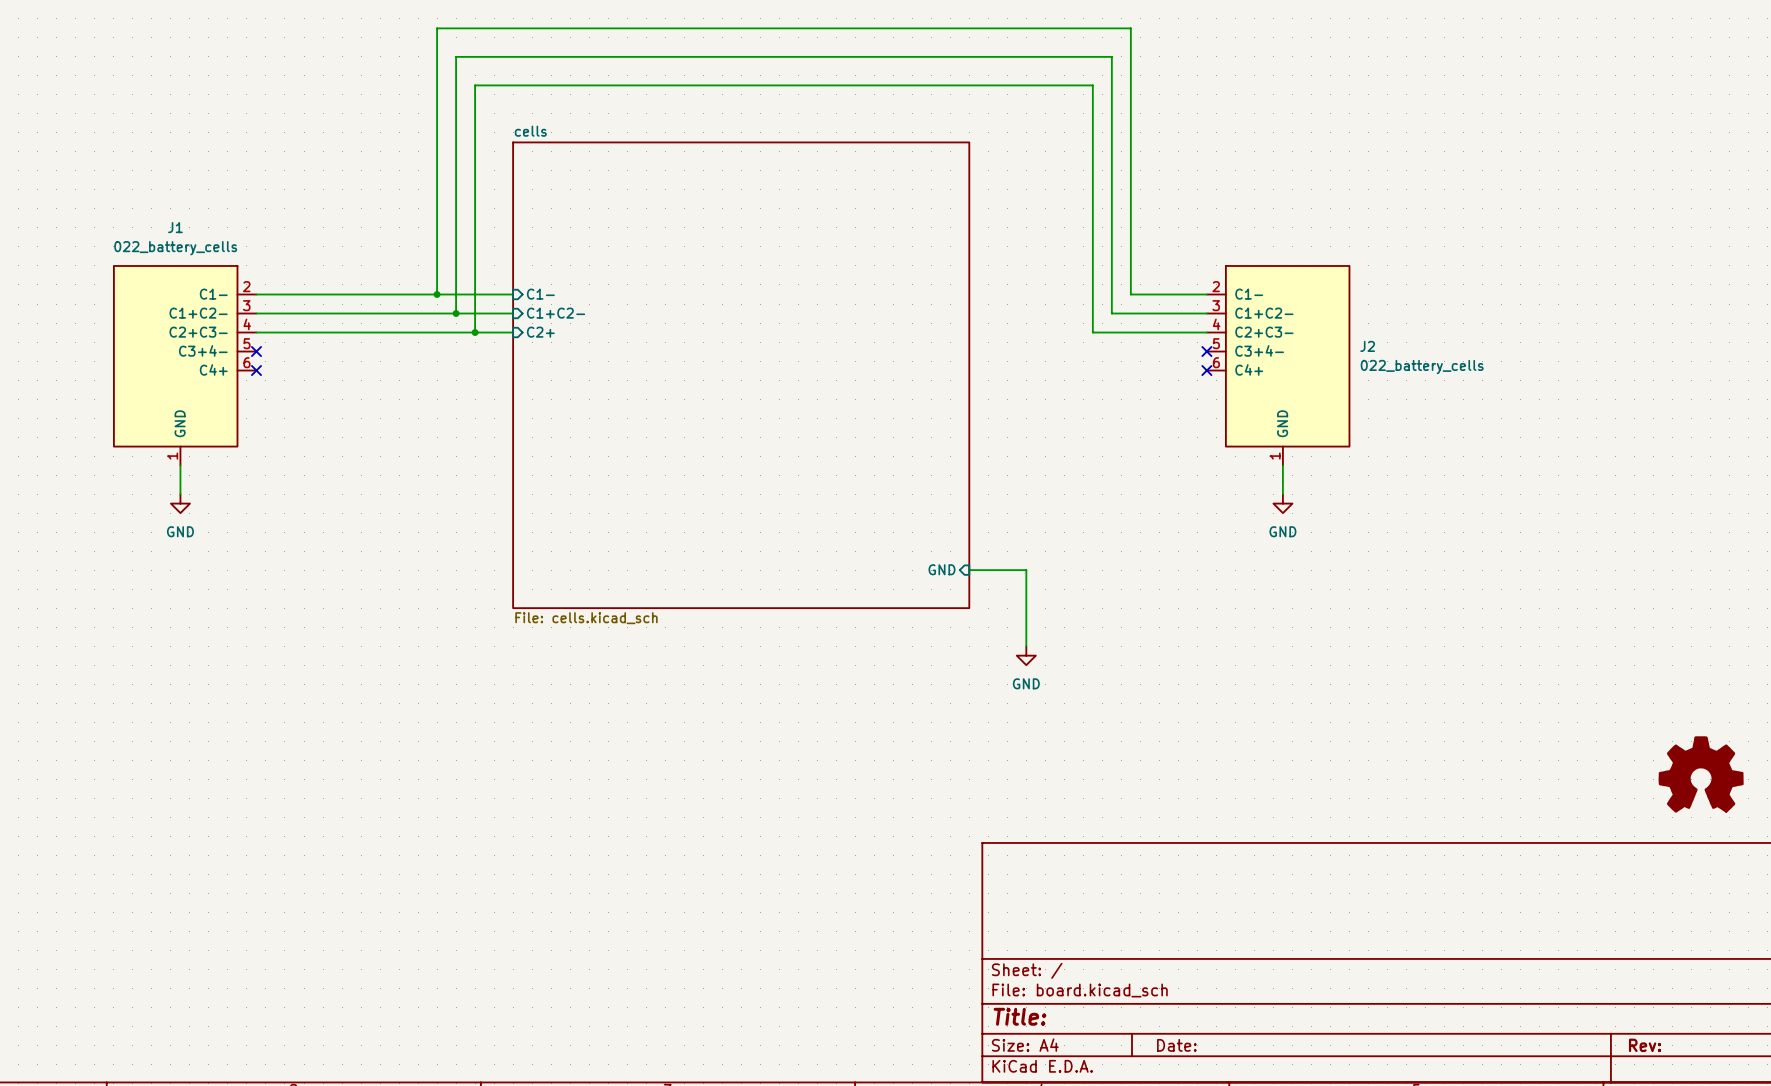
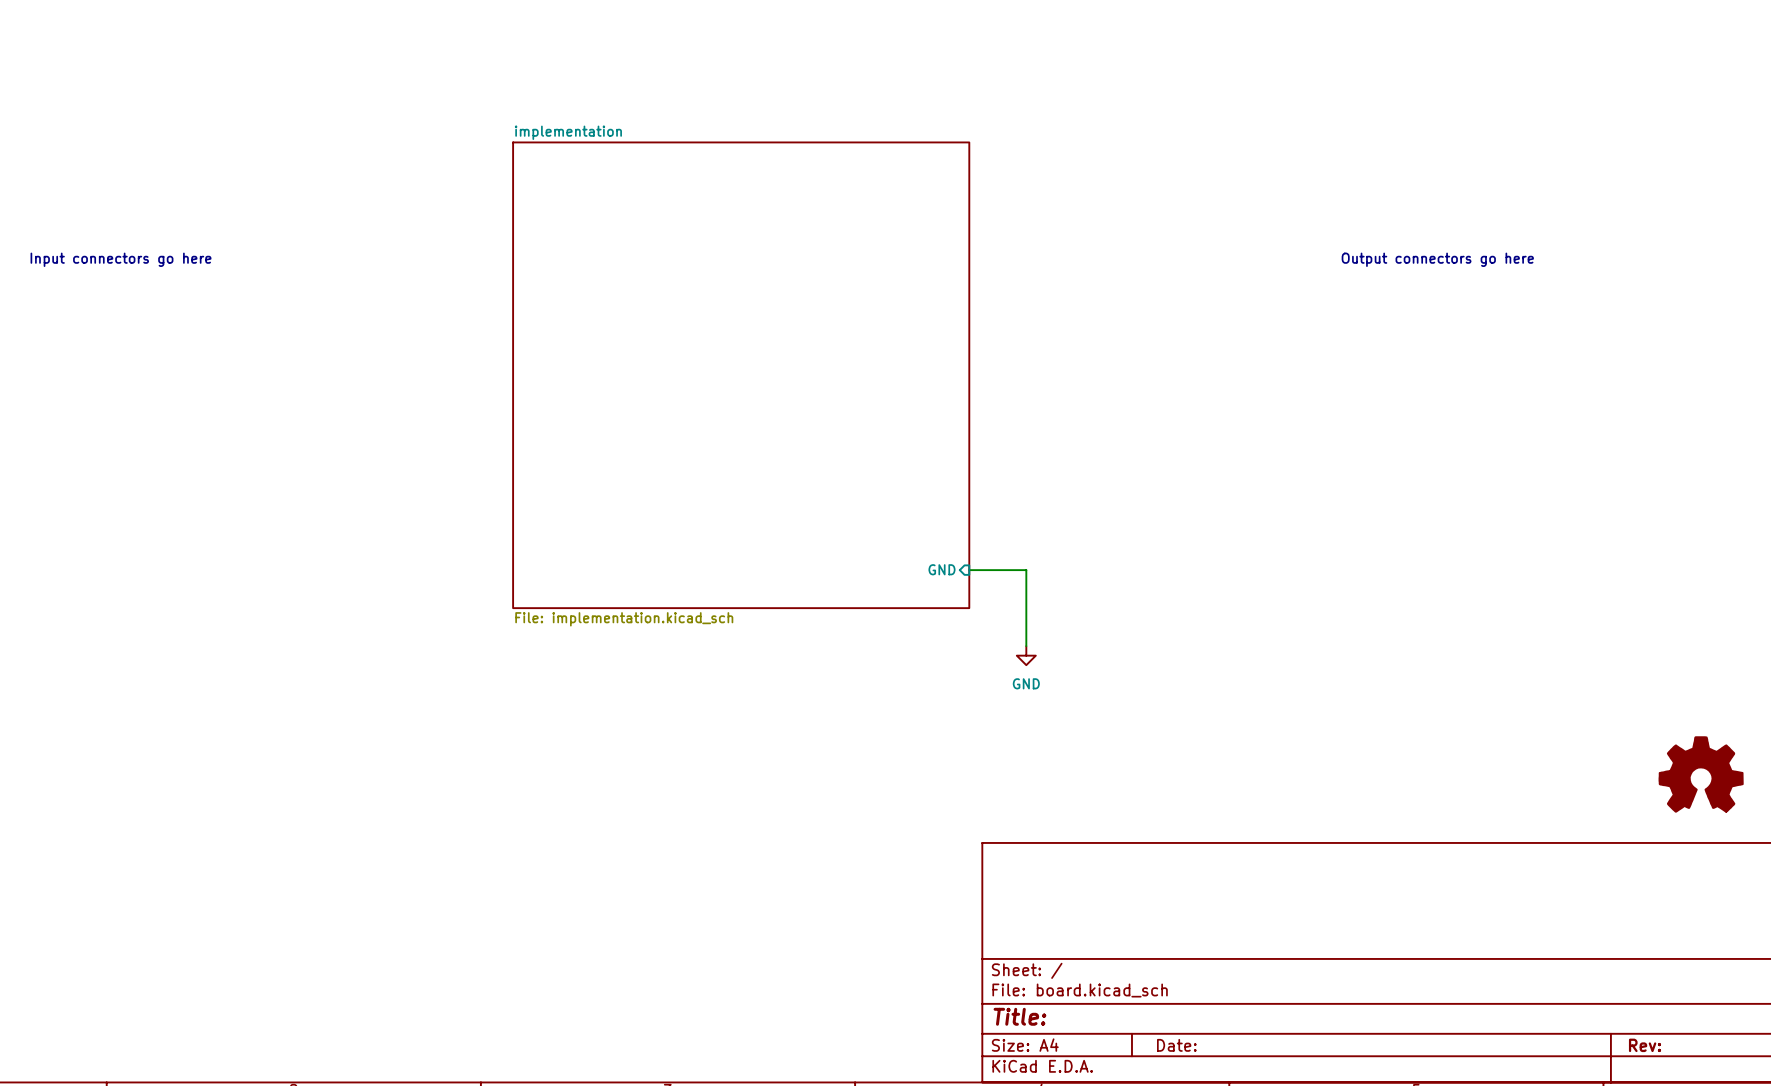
sheet cells name: cells (530, 131) -> implementation (568, 132)
text: none -> Input connectors go here (121, 259)
text: none -> Output connectors go here (1437, 259)
wire: (256, 294) (513, 294) -> none
wire: (437, 294) (437, 28) (1130, 28) (1130, 294) (1206, 294) -> none
junction: (437, 294) -> none
sheet pin: C1- (540, 294) -> none
wire: (256, 313) (513, 313) -> none
wire: (456, 313) (456, 56) (1111, 56) (1111, 313) (1206, 313) -> none
junction: (456, 313) -> none
sheet pin: C1+C2- (556, 313) -> none
wire: (256, 332) (513, 332) -> none
wire: (475, 332) (475, 85) (1092, 85) (1092, 332) (1206, 332) -> none
junction: (475, 332) -> none
sheet pin: C2+ (540, 332) -> none
no-connect mark: (256, 351) -> none
no-connect mark: (1206, 351) -> none
J1: 022_battery_cells (185, 365) -> none
J2: 022_battery_cells (1278, 365) -> none
no-connect mark: (256, 370) -> none
no-connect mark: (1206, 370) -> none
wire: (180, 465) (180, 494) -> none
wire: (1282, 465) (1282, 494) -> none
power symbol: GND (180, 503) -> none
power symbol: GND (1282, 503) -> none
sheet cells value: File: cells.kicad_sch (586, 618) -> File: implementation.kicad_sch (624, 619)

